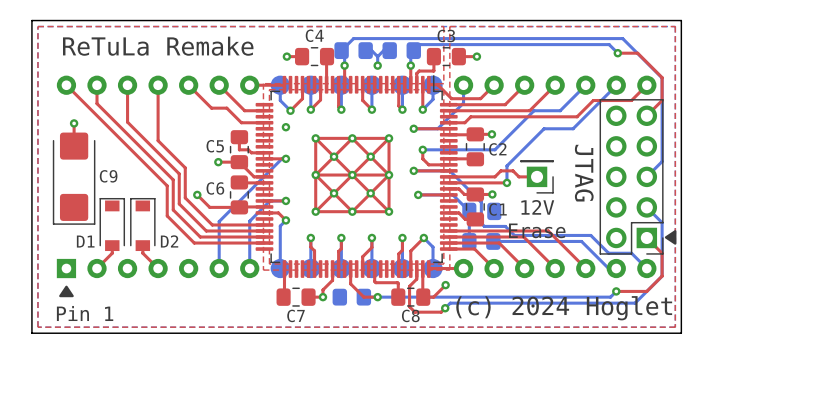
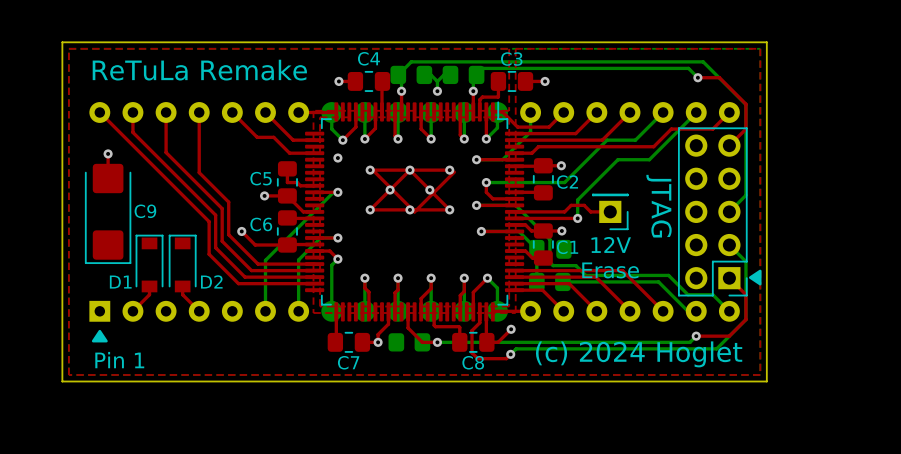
top track: (315, 175) (352, 211) (389, 175) -> (374, 172) (414, 211) (454, 172)
via: (334, 193) -> none
via: (370, 193) -> none
top track: (315, 211) (389, 138) (389, 211) -> none
top track: (315, 211) (315, 138) (389, 211) -> none
top track: (315, 211) (389, 211) -> none
via: (315, 211) -> none
via: (352, 211) -> none
via: (389, 211) -> none

